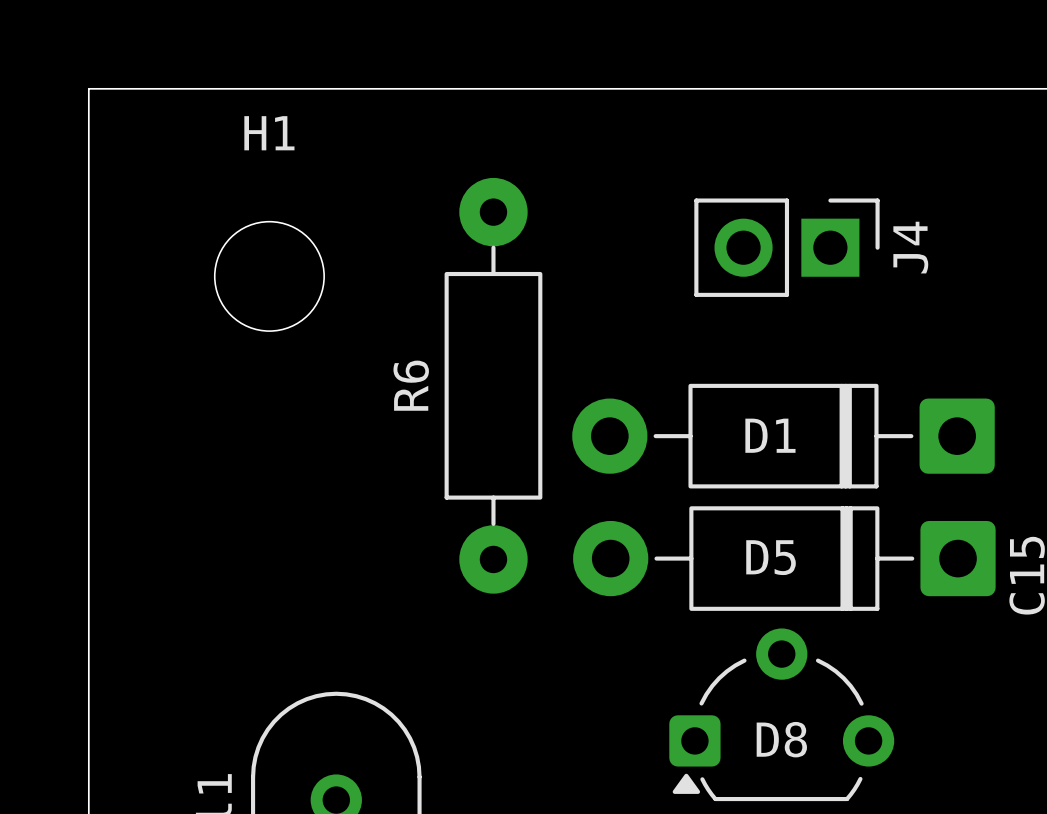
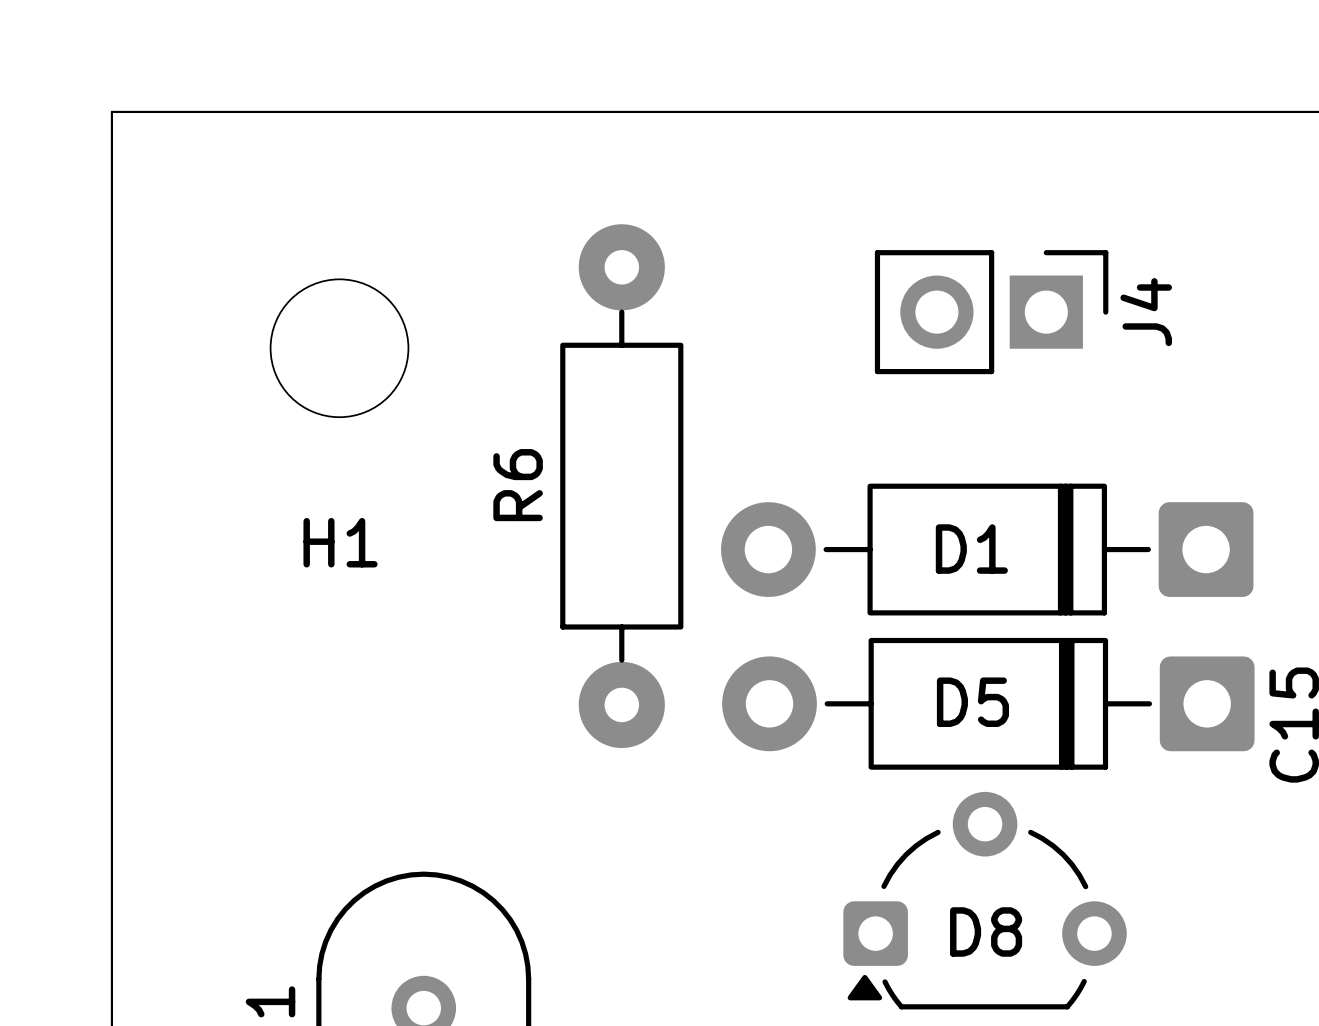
H1 name position: H1 (269, 133) -> H1 (340, 542)

